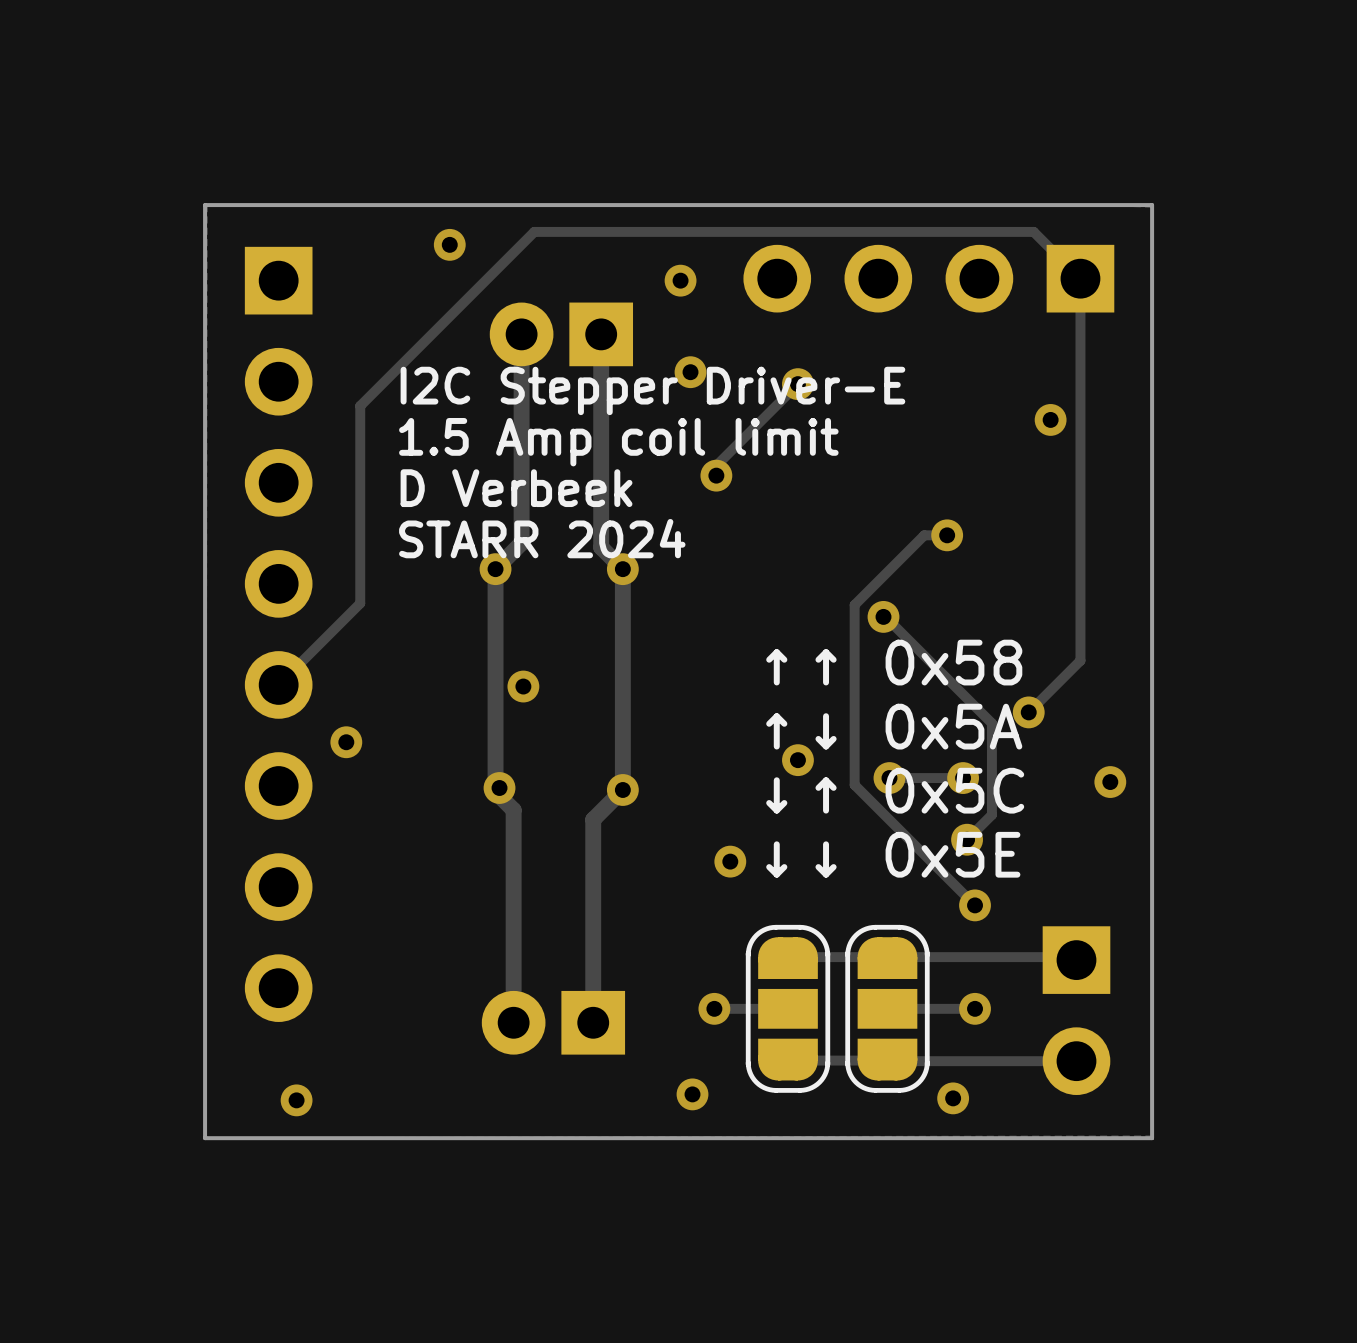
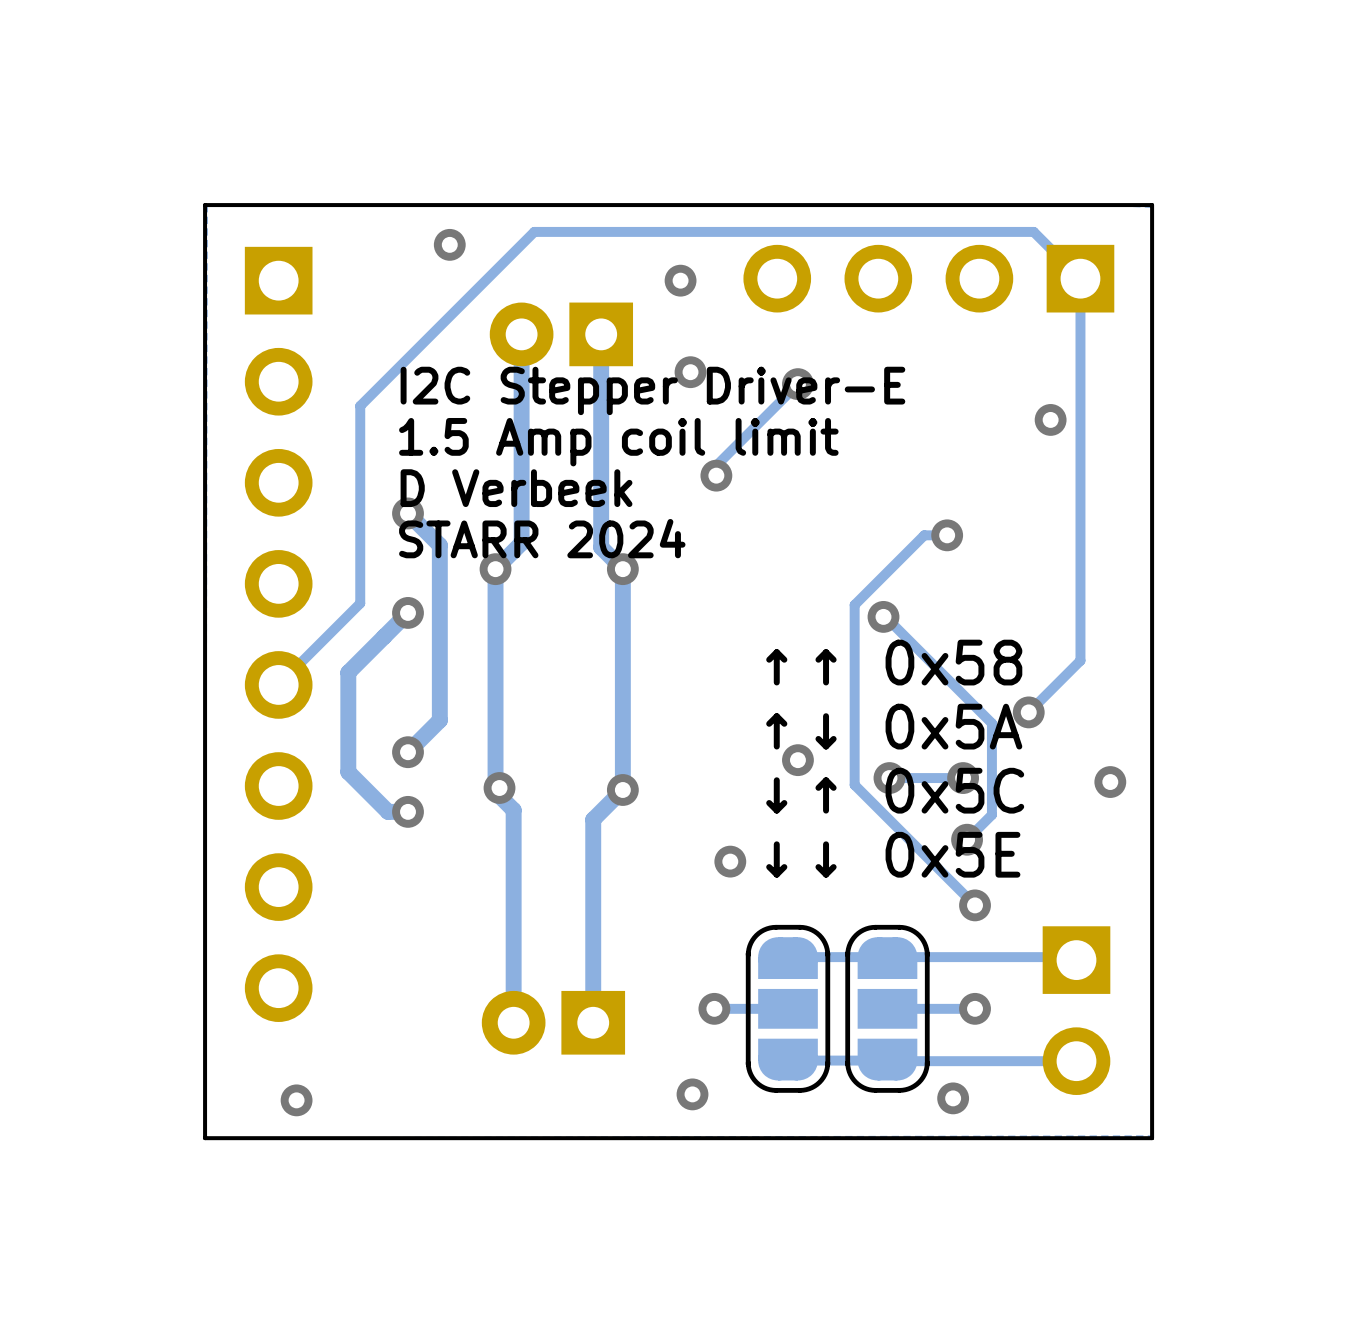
track: none -> (408, 513) (439, 545) (439, 720) (408, 752)
via: none -> (408, 513)
track: none -> (408, 612) (348, 672) (348, 772) (388, 811) (408, 811)
via: none -> (408, 612)
via: (523, 686) -> none
via: (346, 742) -> none
via: none -> (408, 752)
via: none -> (408, 811)

